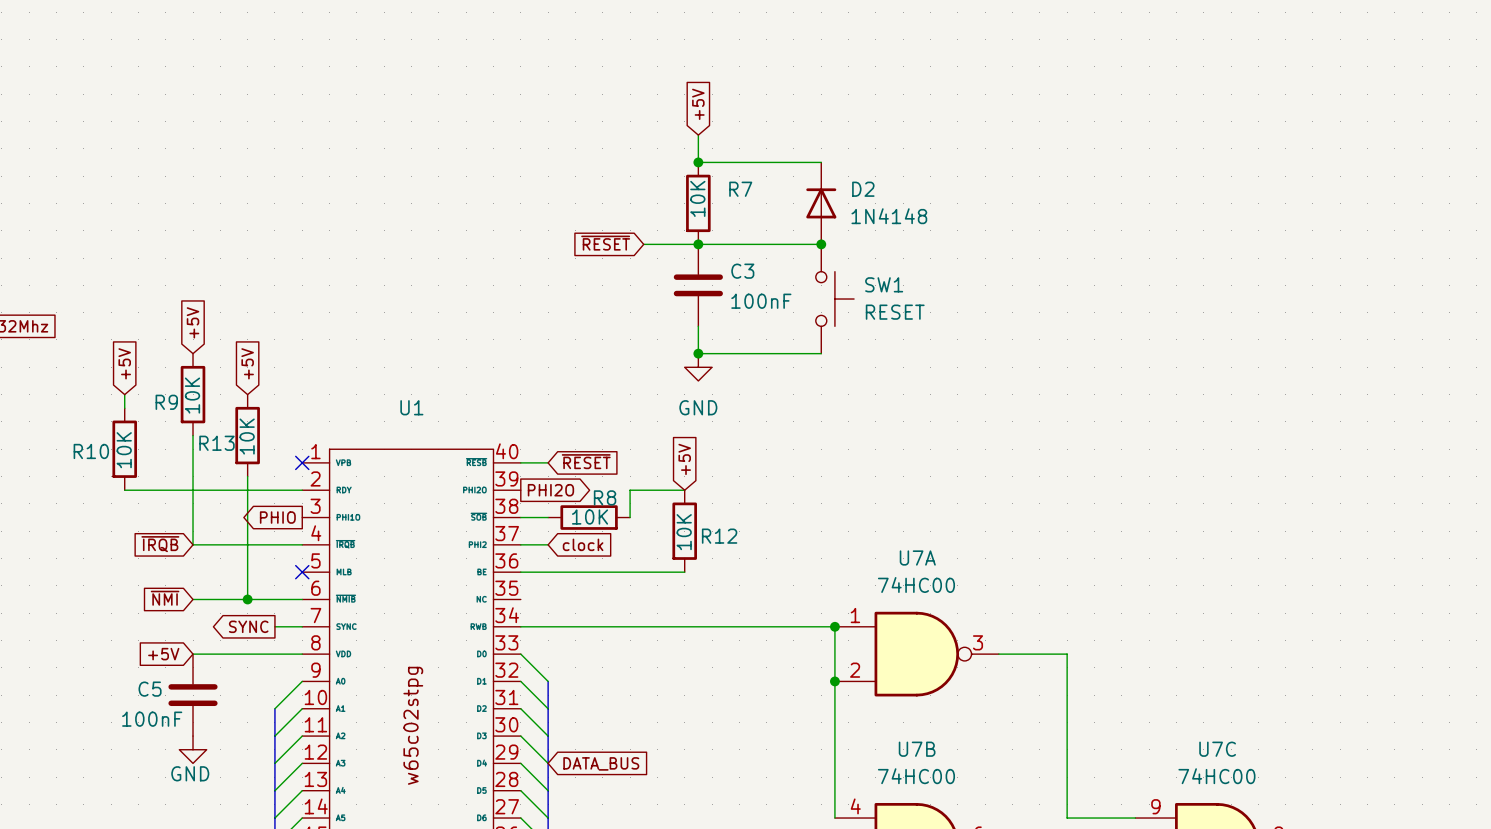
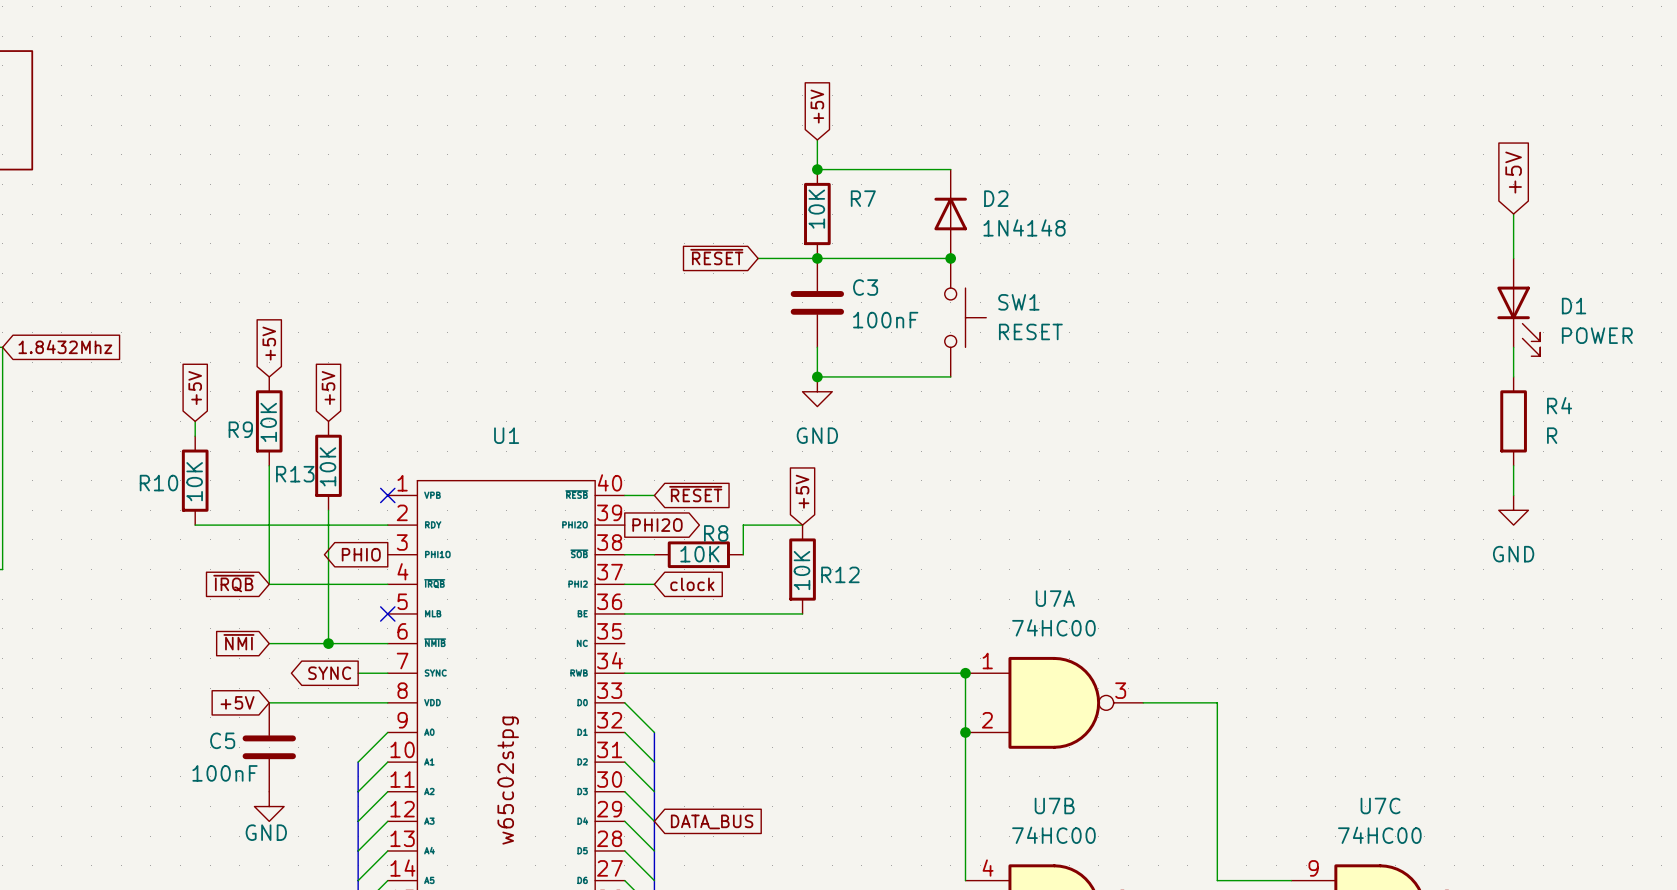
global label: none -> +5V (1513, 172)
wire: none -> (1513, 214) (1513, 258)
D1: none -> POWER (1518, 307)
wire: none -> (1513, 347) (1513, 376)
R4: none -> R (1513, 421)
wire: none -> (1513, 465) (1513, 495)
power symbol: none -> GND (1513, 510)

